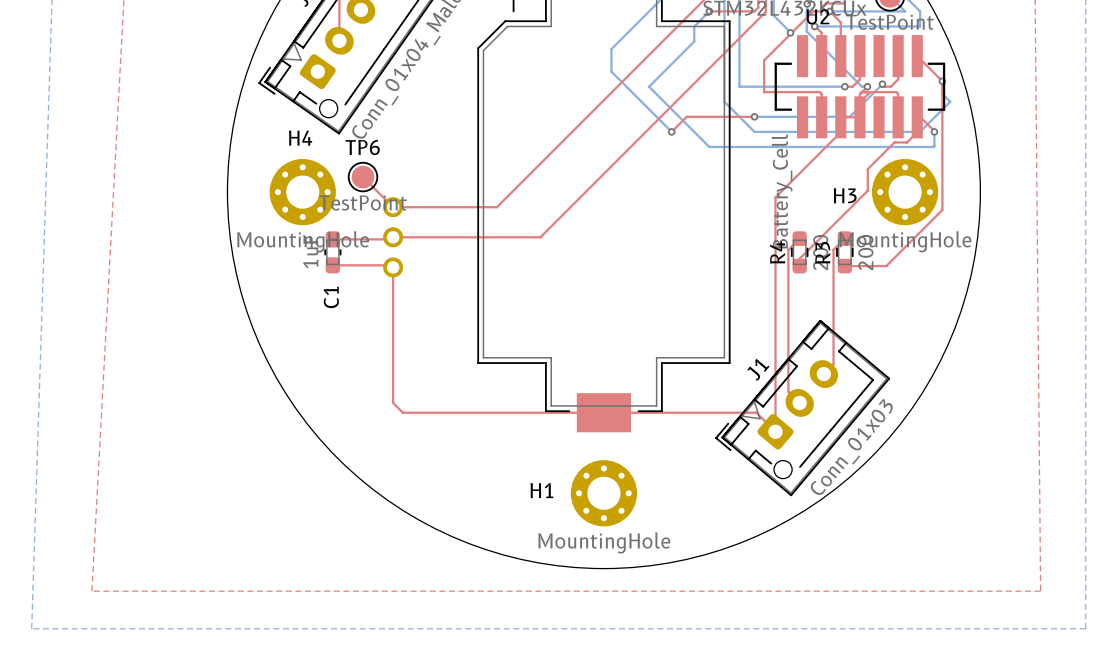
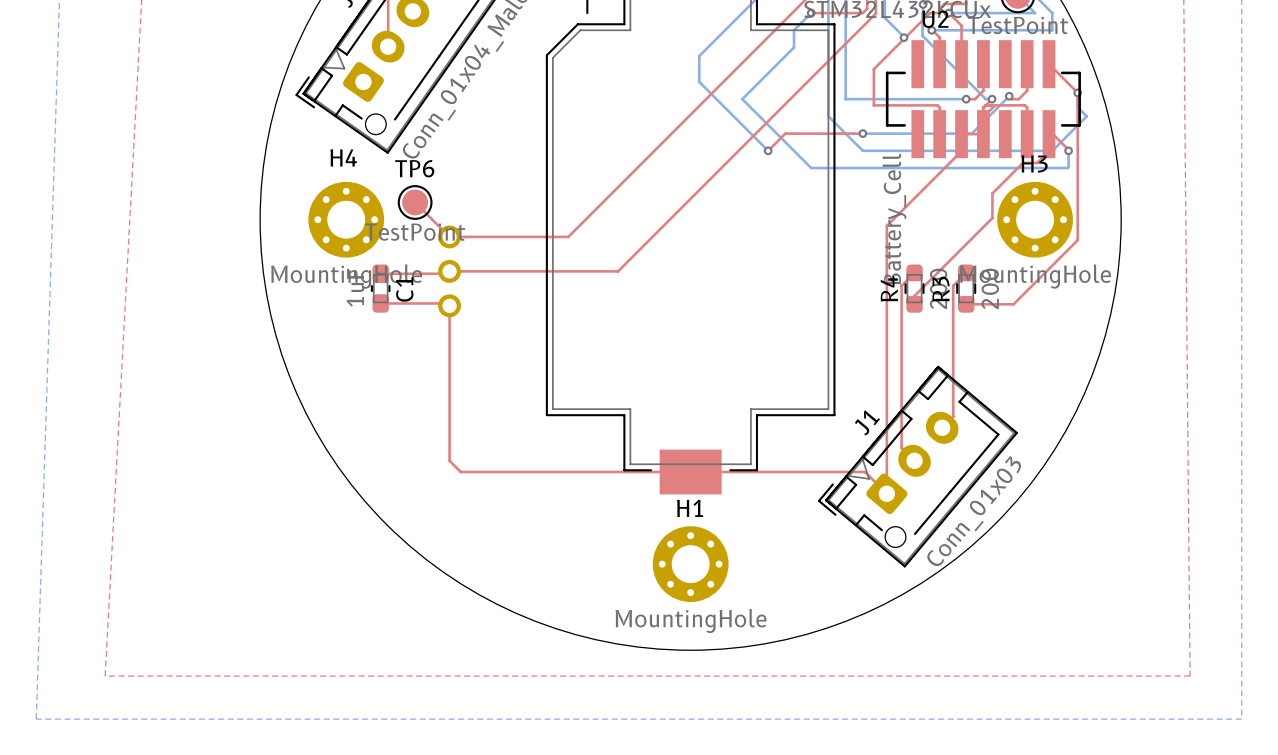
H3 name position: H3 (845, 195) -> H3 (1034, 163)
C1 name position: C1 (331, 297) -> C1 (404, 289)
H1 name position: H1 (541, 490) -> H1 (690, 508)

